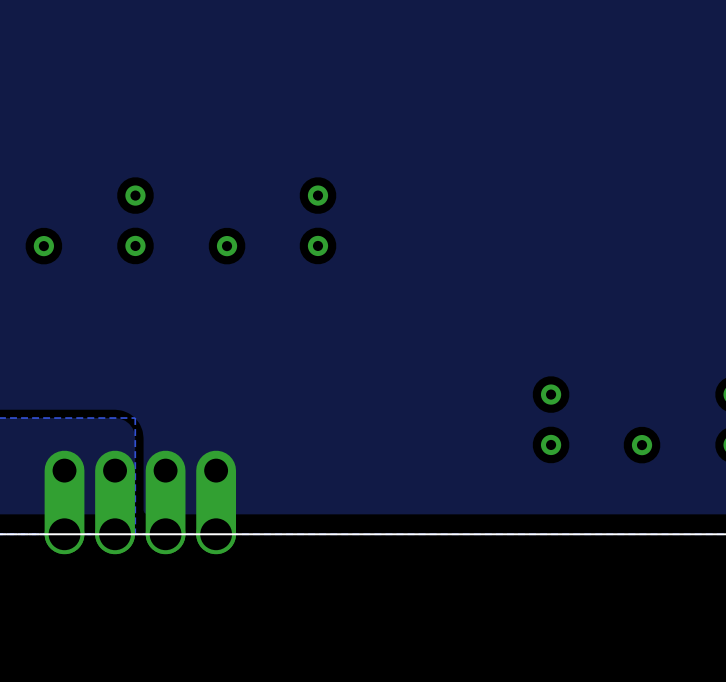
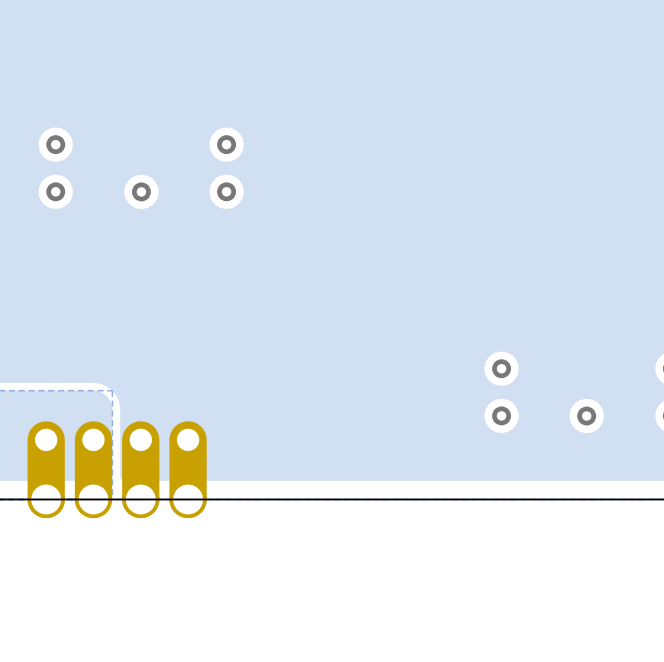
via: none -> (55, 144)
via: none -> (226, 144)
via: (135, 195) -> none
via: (317, 195) -> none
via: none -> (55, 191)
via: none -> (141, 191)
via: none -> (226, 191)
via: (135, 245) -> none
via: (318, 245) -> none
via: (43, 246) -> none
via: (227, 246) -> none

